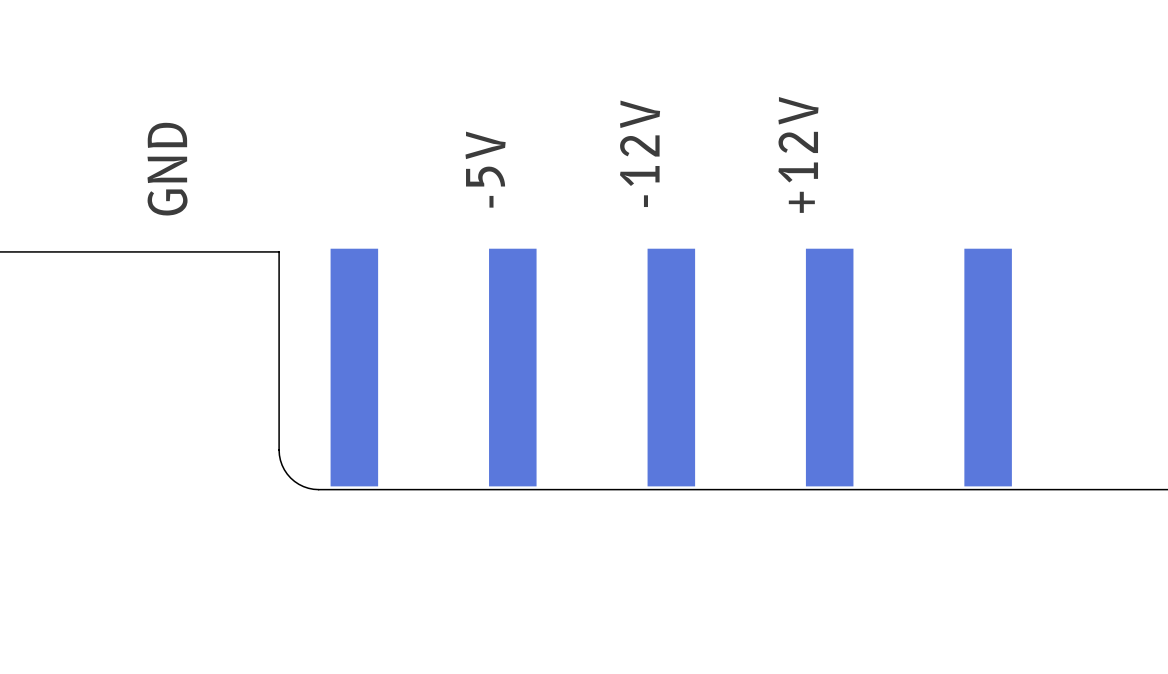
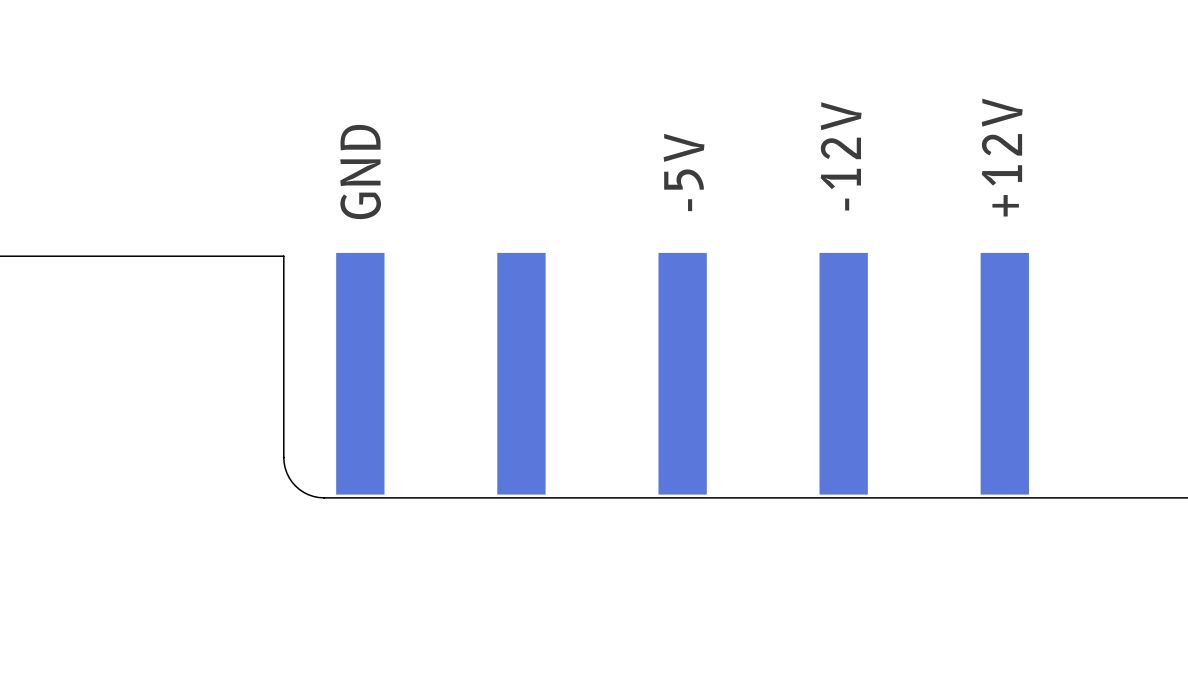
text: -12V (640, 153) -> none
text: +12V (798, 154) -> -12V (841, 156)
text: none -> +12V (1002, 157)
text position: GND (167, 169) -> GND (360, 172)
text position: -5V (485, 169) -> -5V (684, 172)

